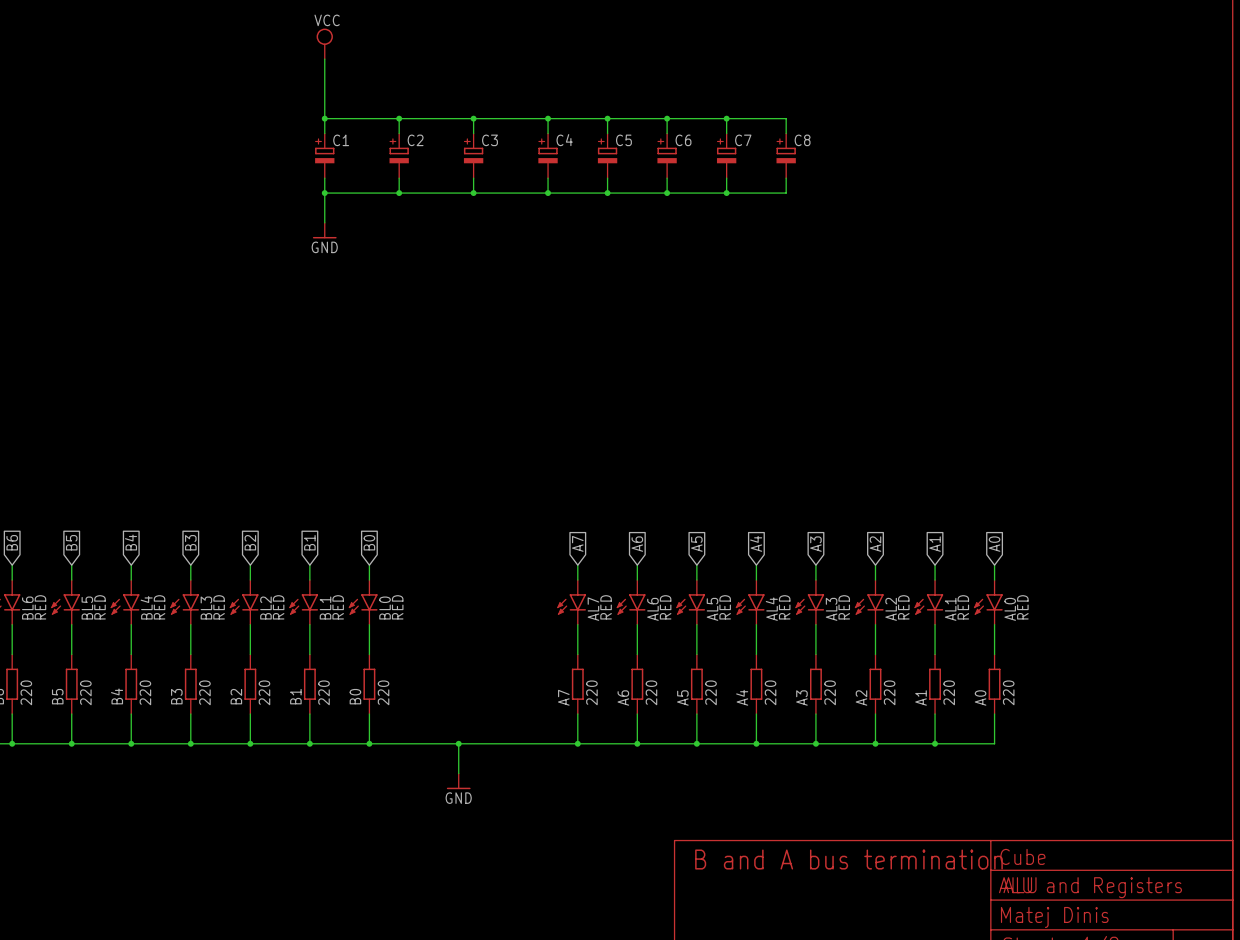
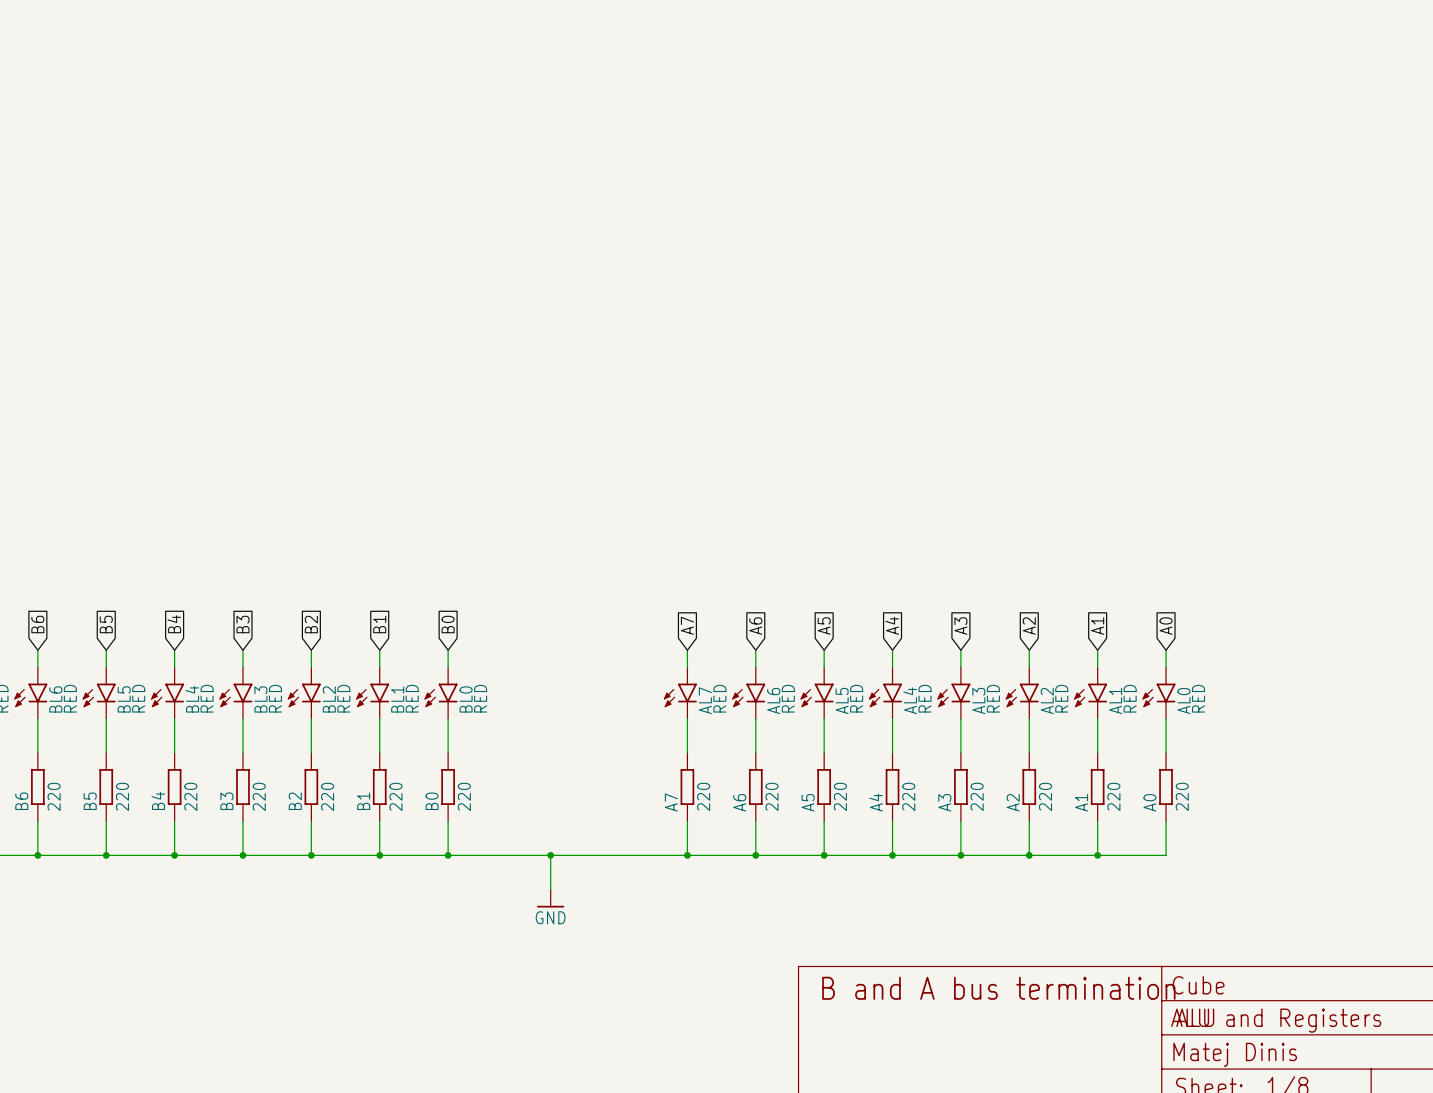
power symbol: VCC (324, 43) -> none
wire: (324, 59) (324, 133) -> none
wire: (324, 118) (786, 118) (786, 133) -> none
junction: (324, 118) -> none
wire: (399, 118) (399, 133) -> none
junction: (399, 118) -> none
wire: (473, 118) (473, 133) -> none
junction: (473, 118) -> none
wire: (548, 118) (548, 133) -> none
junction: (548, 118) -> none
wire: (607, 118) (607, 133) -> none
junction: (607, 118) -> none
wire: (667, 118) (667, 133) -> none
junction: (667, 118) -> none
wire: (726, 118) (726, 133) -> none
junction: (726, 118) -> none
C1: (324, 155) -> none
C2: (399, 155) -> none
C3: (473, 155) -> none
C4: (548, 155) -> none
C5: (607, 155) -> none
C6: (667, 155) -> none
C7: (726, 155) -> none
C8: (786, 155) -> none
wire: (324, 178) (324, 222) -> none
wire: (399, 178) (399, 193) -> none
wire: (473, 178) (473, 193) -> none
wire: (548, 178) (548, 193) -> none
wire: (607, 178) (607, 193) -> none
wire: (667, 178) (667, 193) -> none
wire: (726, 178) (726, 193) -> none
wire: (786, 178) (786, 193) (324, 193) -> none
junction: (324, 193) -> none
junction: (399, 193) -> none
junction: (473, 193) -> none
junction: (548, 193) -> none
junction: (607, 193) -> none
junction: (667, 193) -> none
junction: (726, 193) -> none
power symbol: GND (324, 230) -> none

